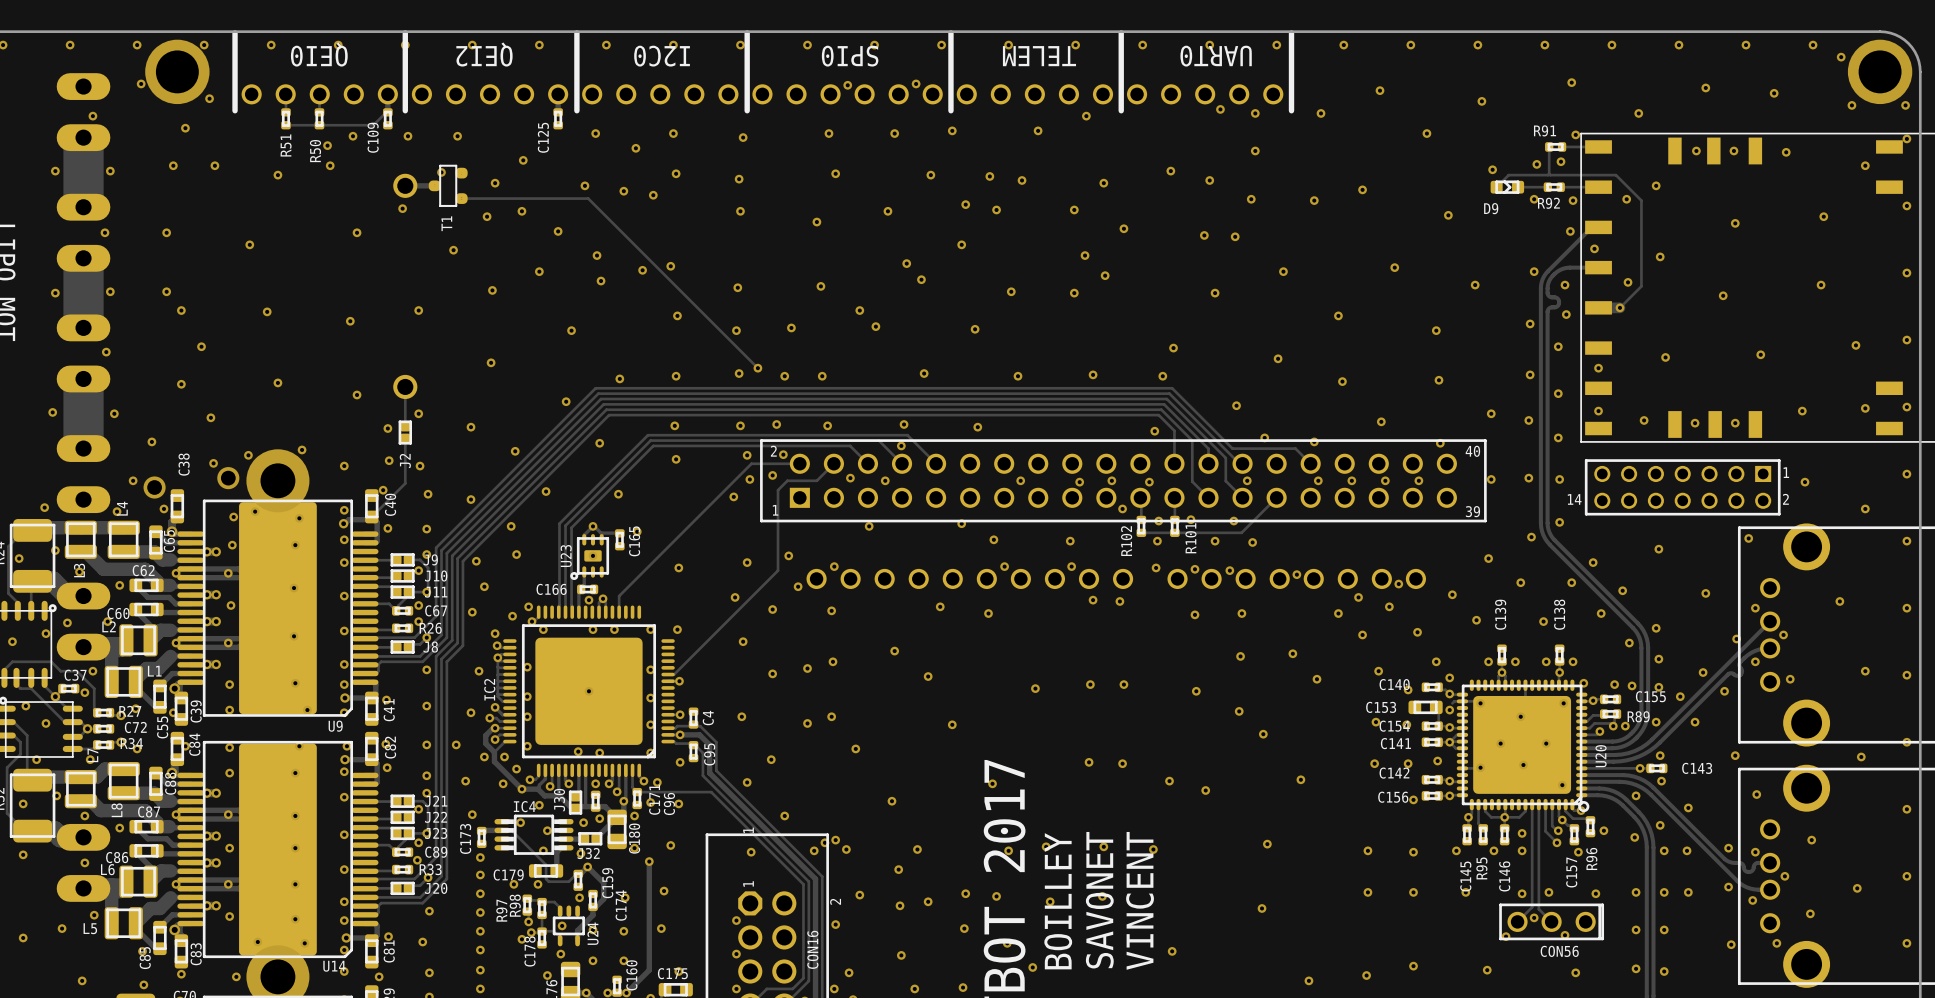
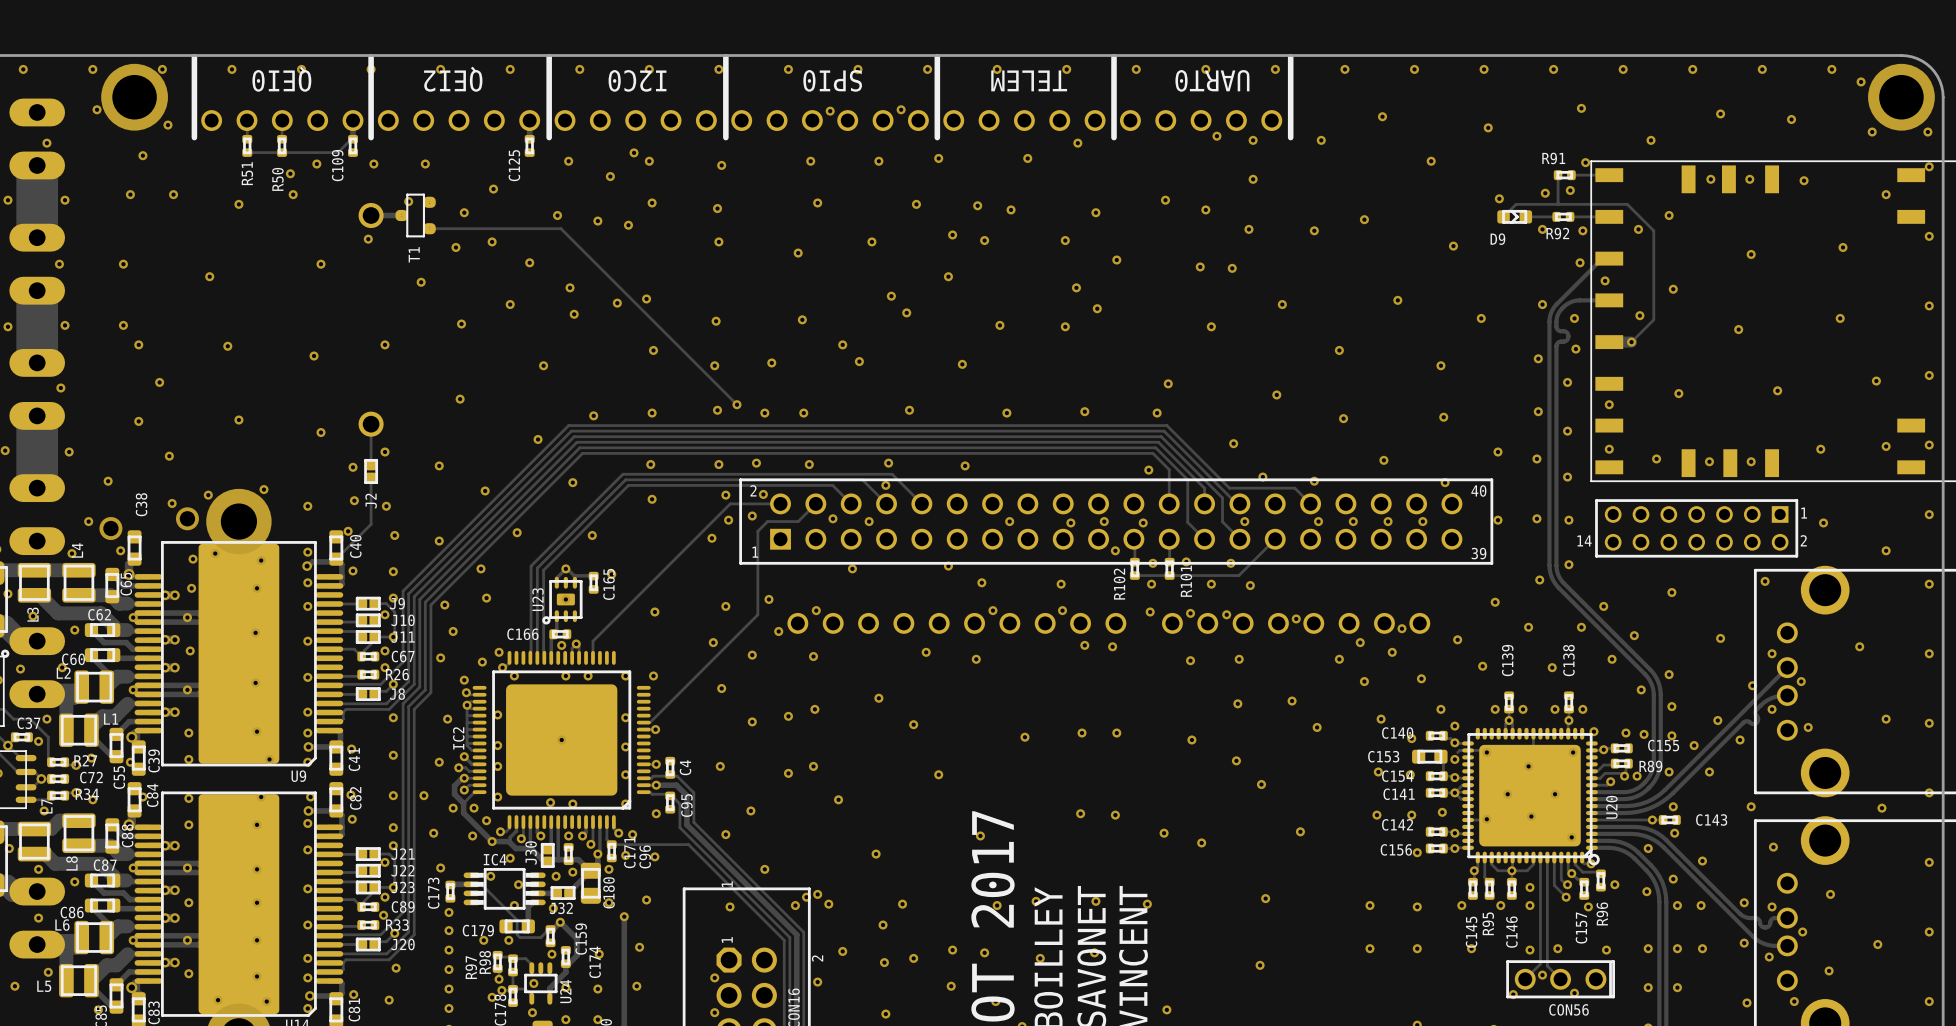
via: none -> (634, 152)

